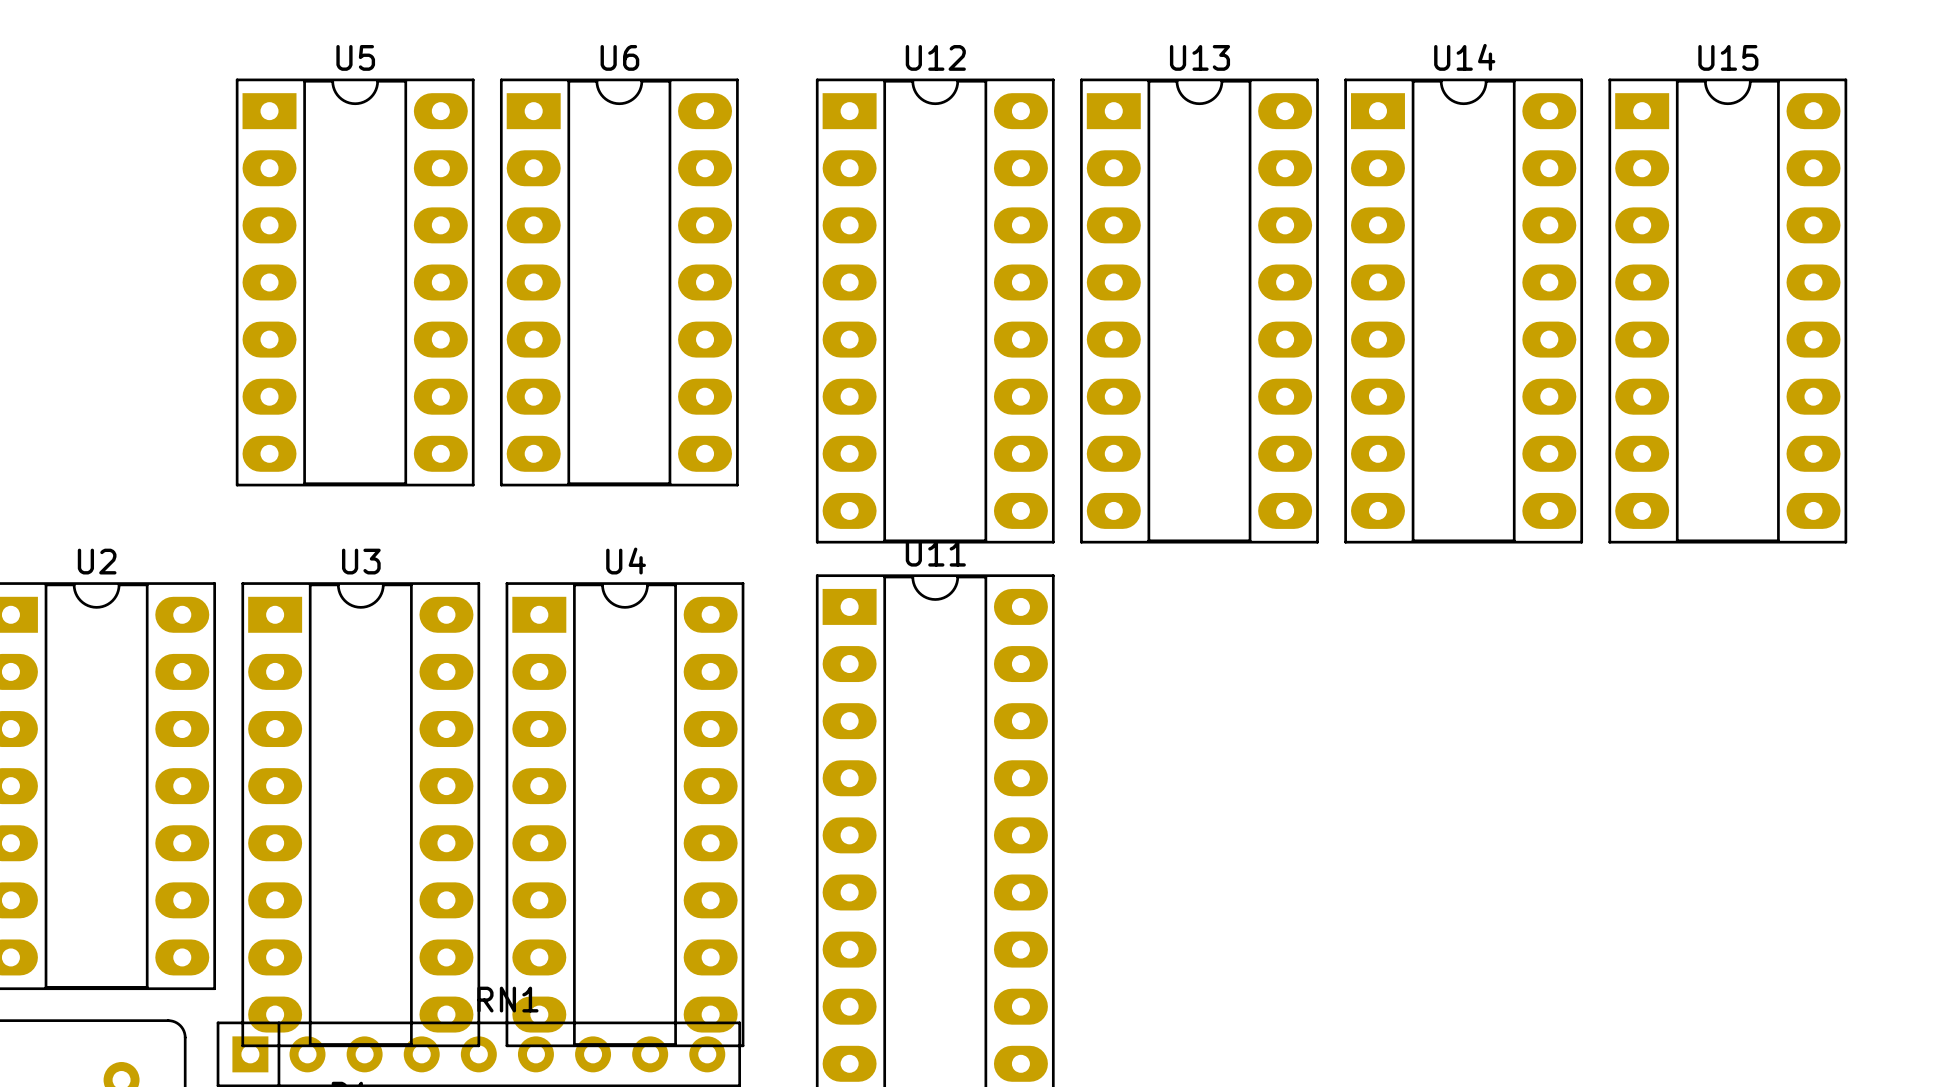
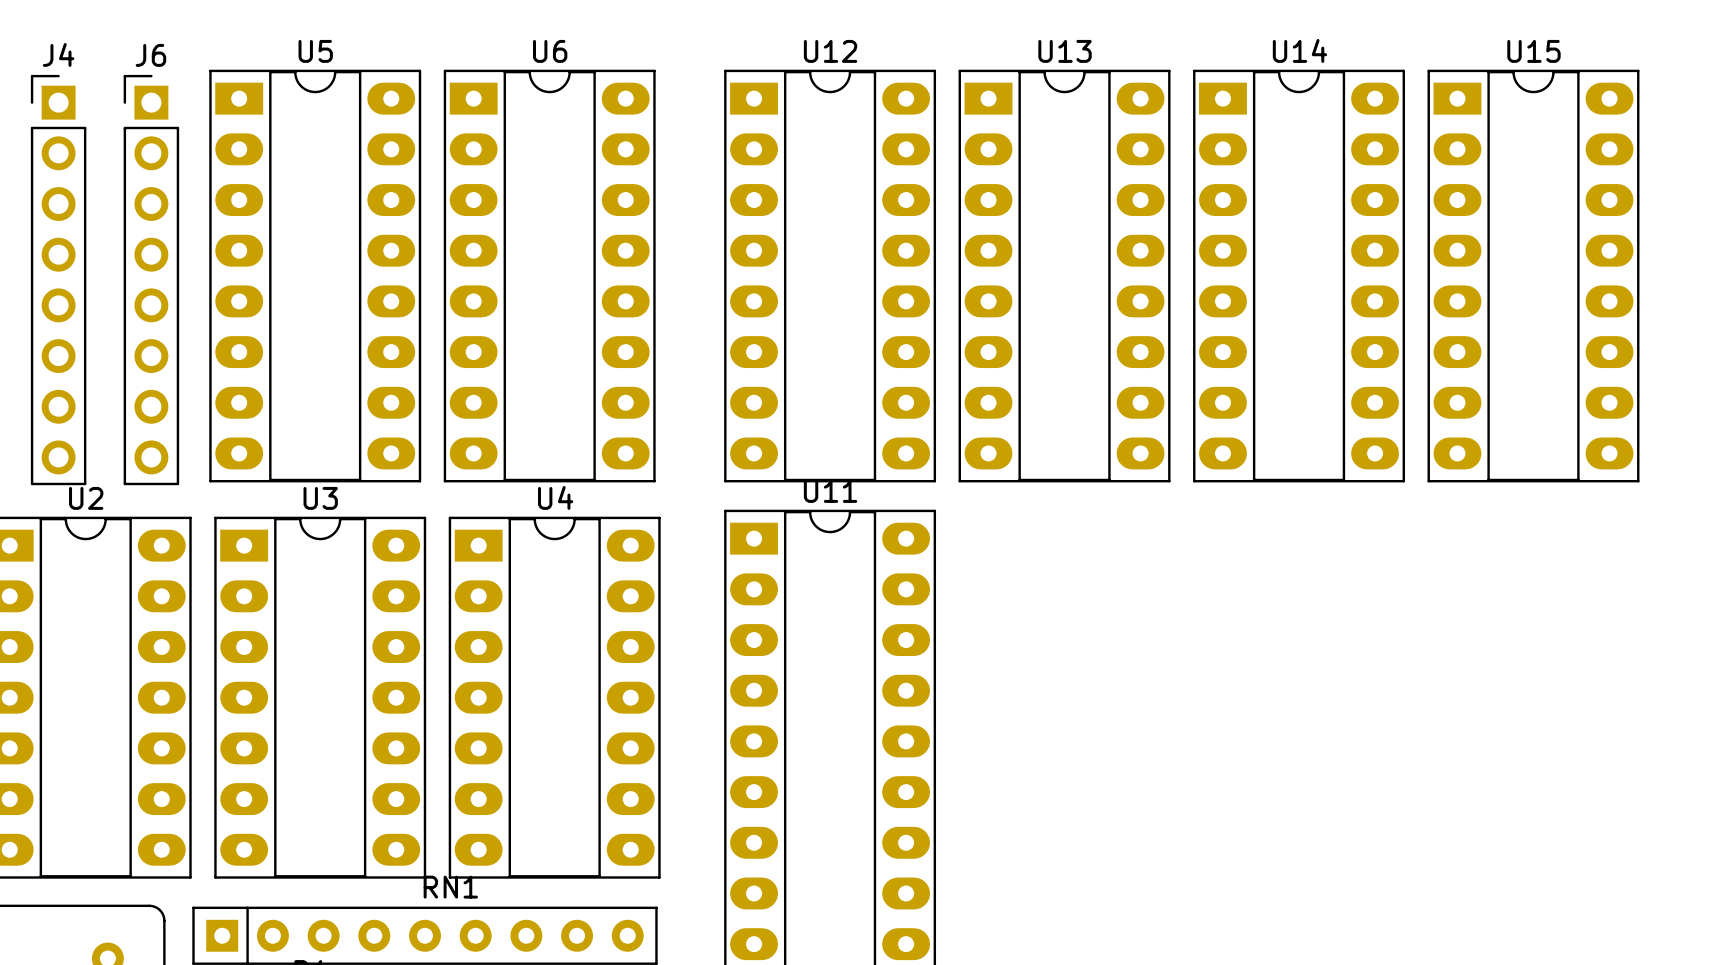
U5 footprint: [235, 78, 475, 487] -> [209, 69, 422, 483]
U6 footprint: [499, 78, 739, 487] -> [443, 69, 656, 483]
J4: none -> (58, 280)
J6: none -> (151, 280)
U3 footprint: [241, 582, 481, 1048] -> [214, 516, 427, 879]
U4 footprint: [505, 582, 745, 1048] -> [448, 516, 661, 879]

